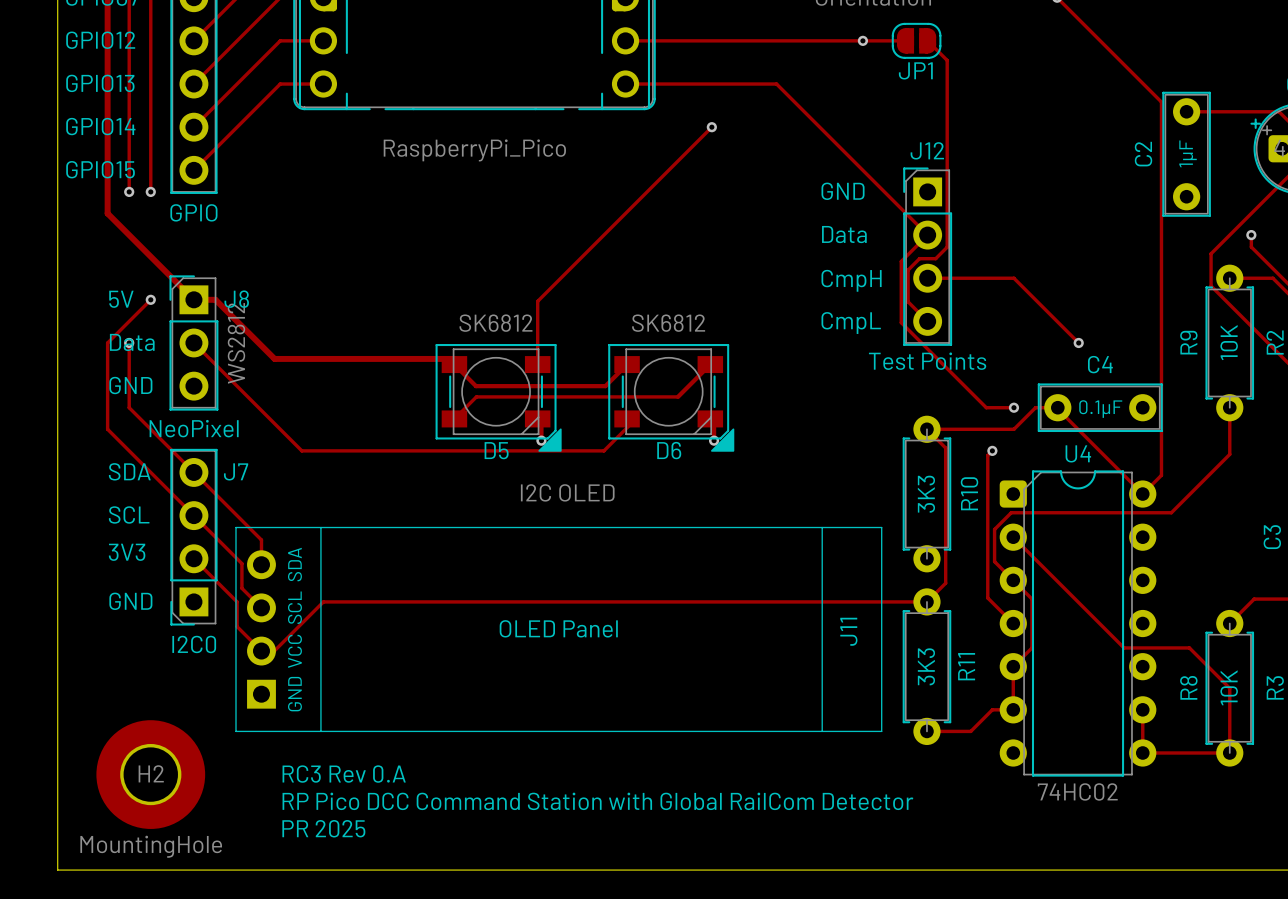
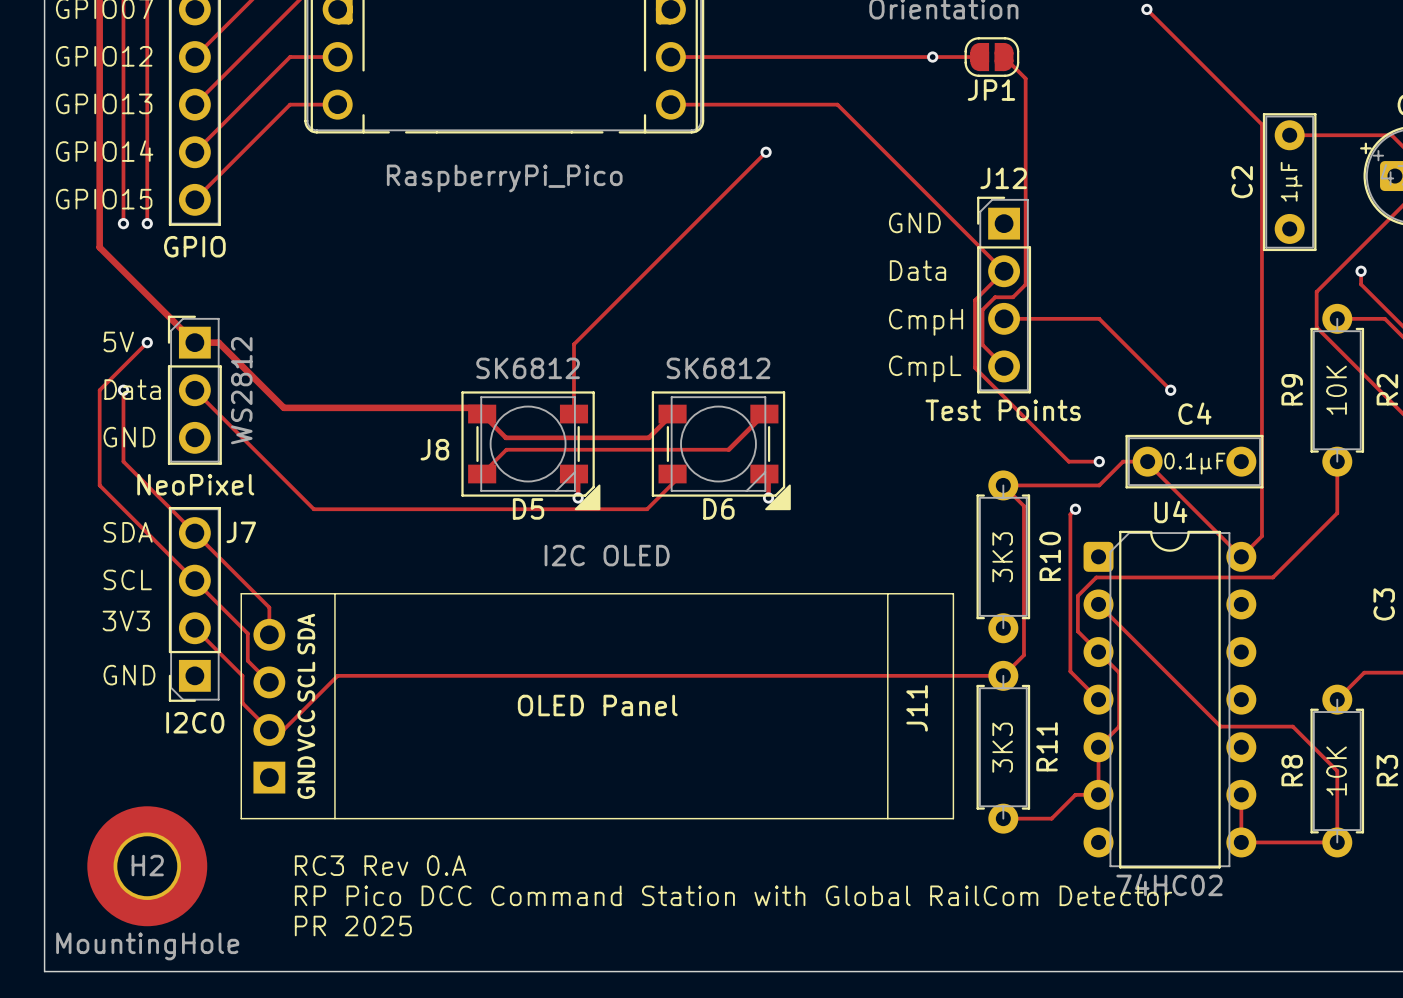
J8 name position: J8 (236, 299) -> J8 (434, 449)

